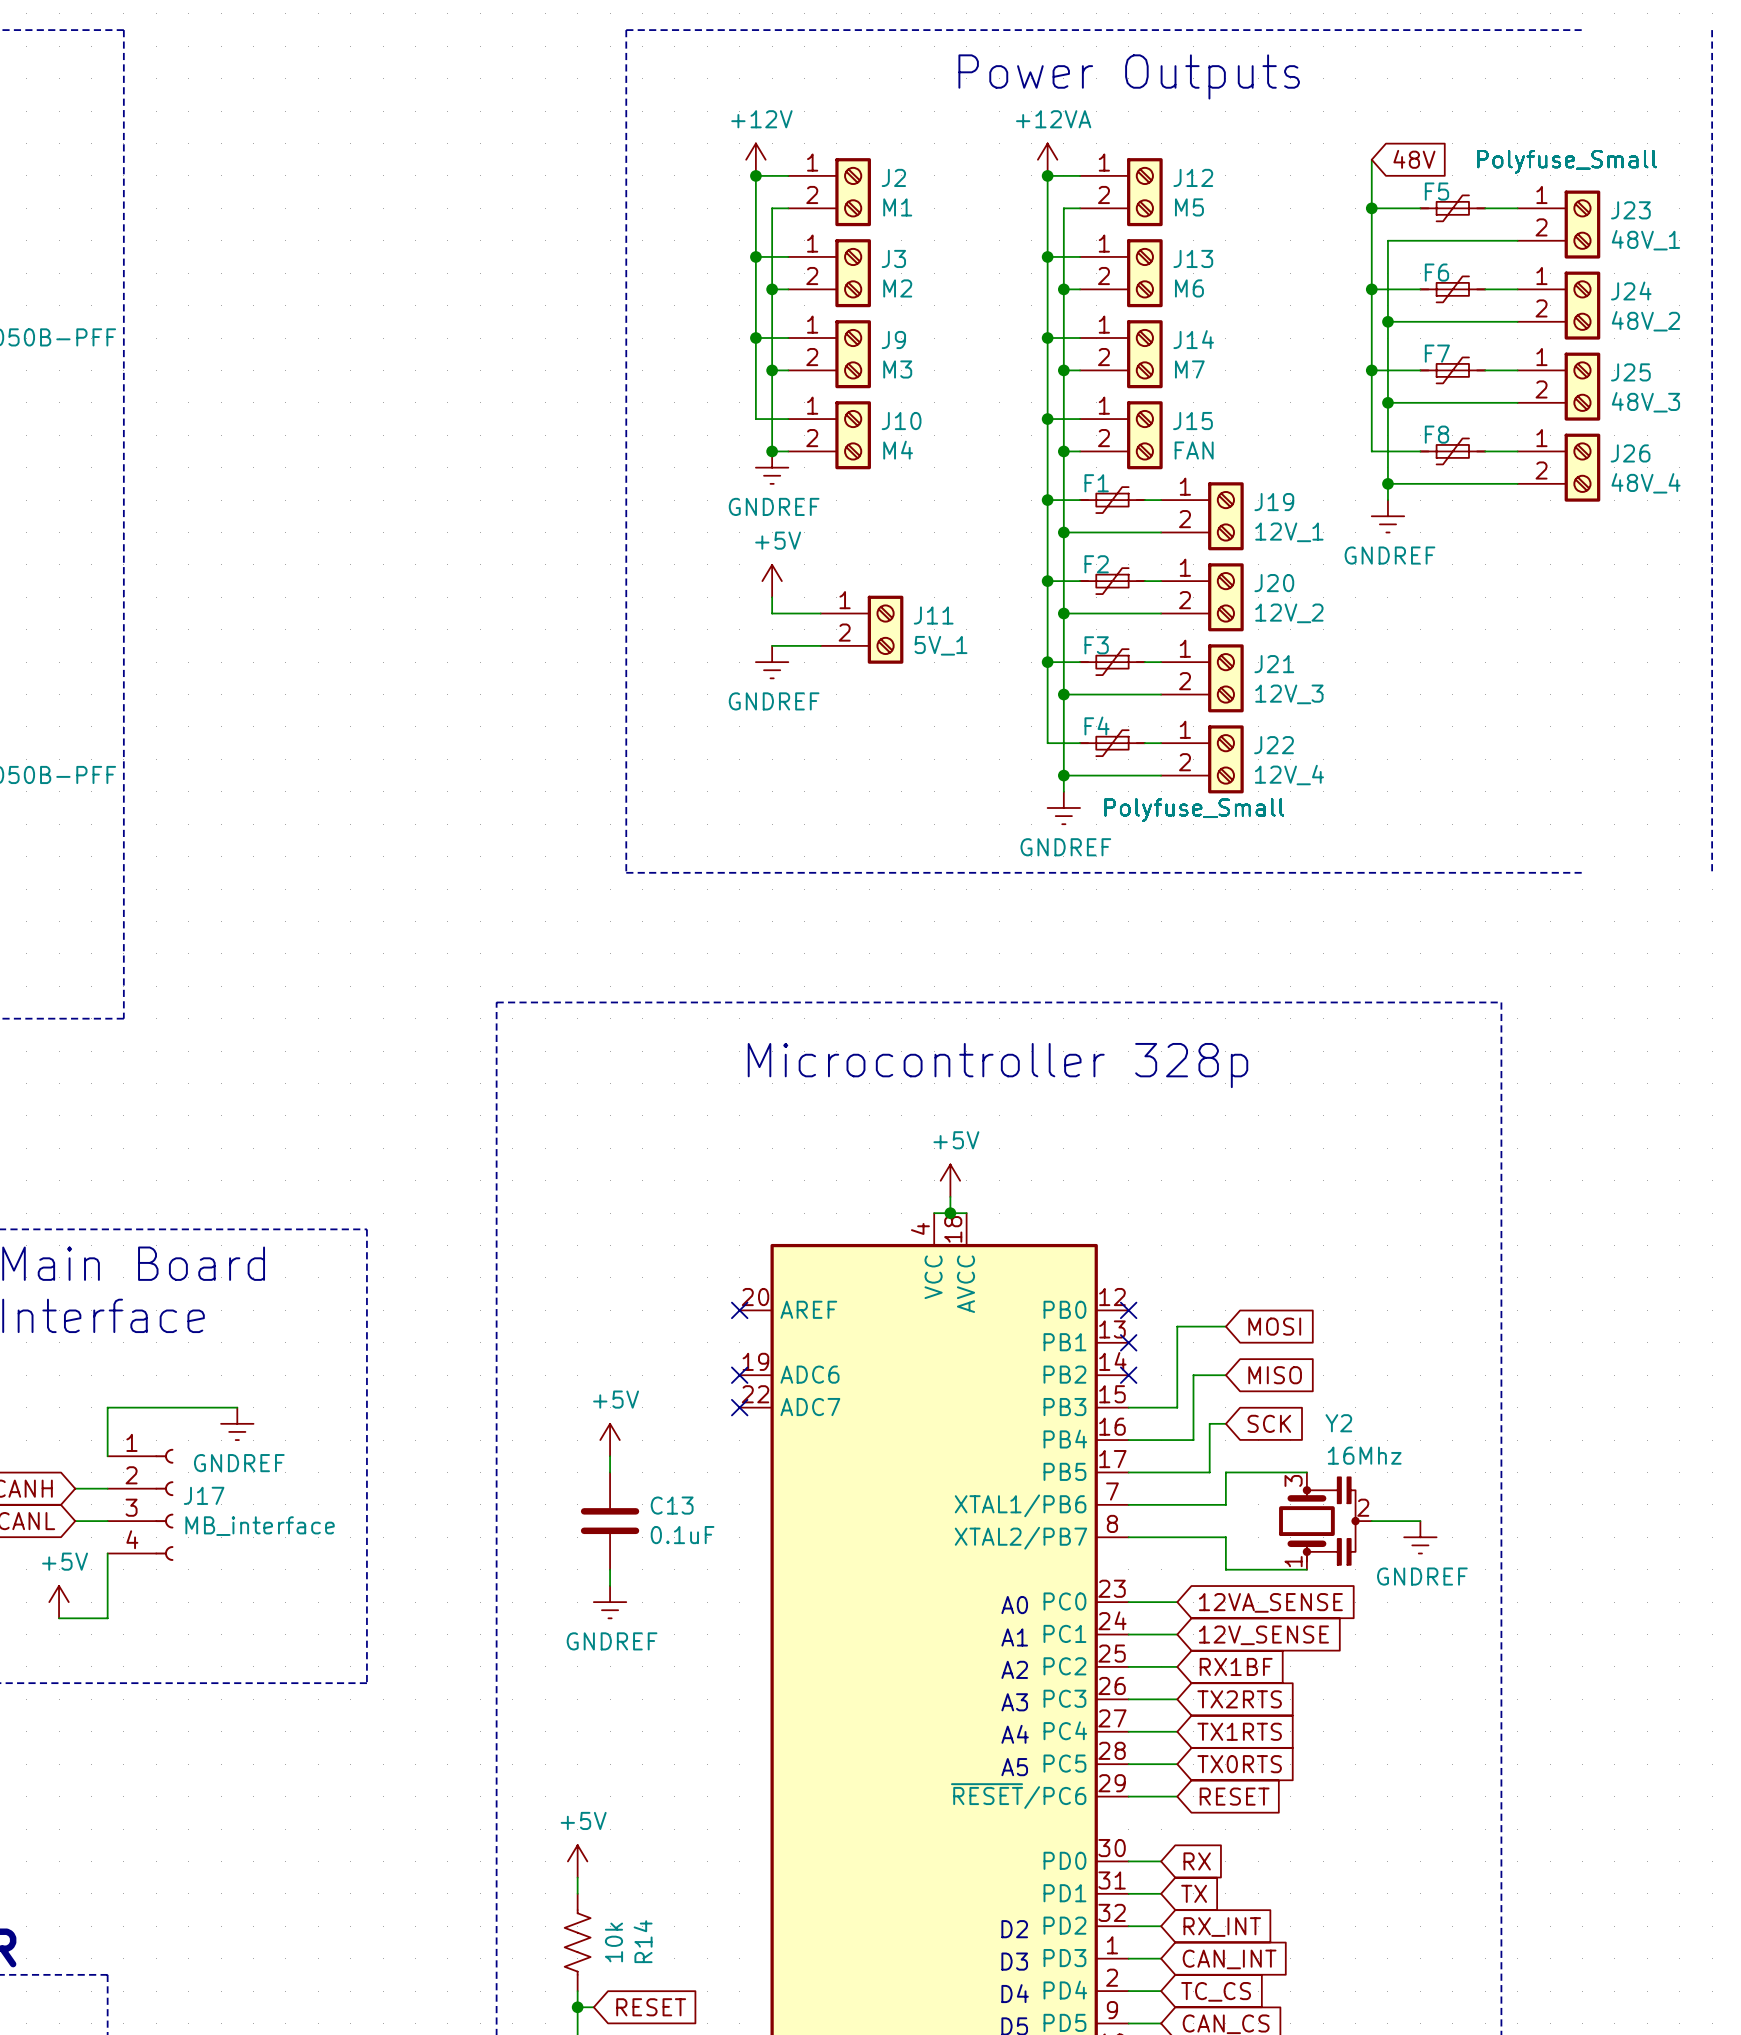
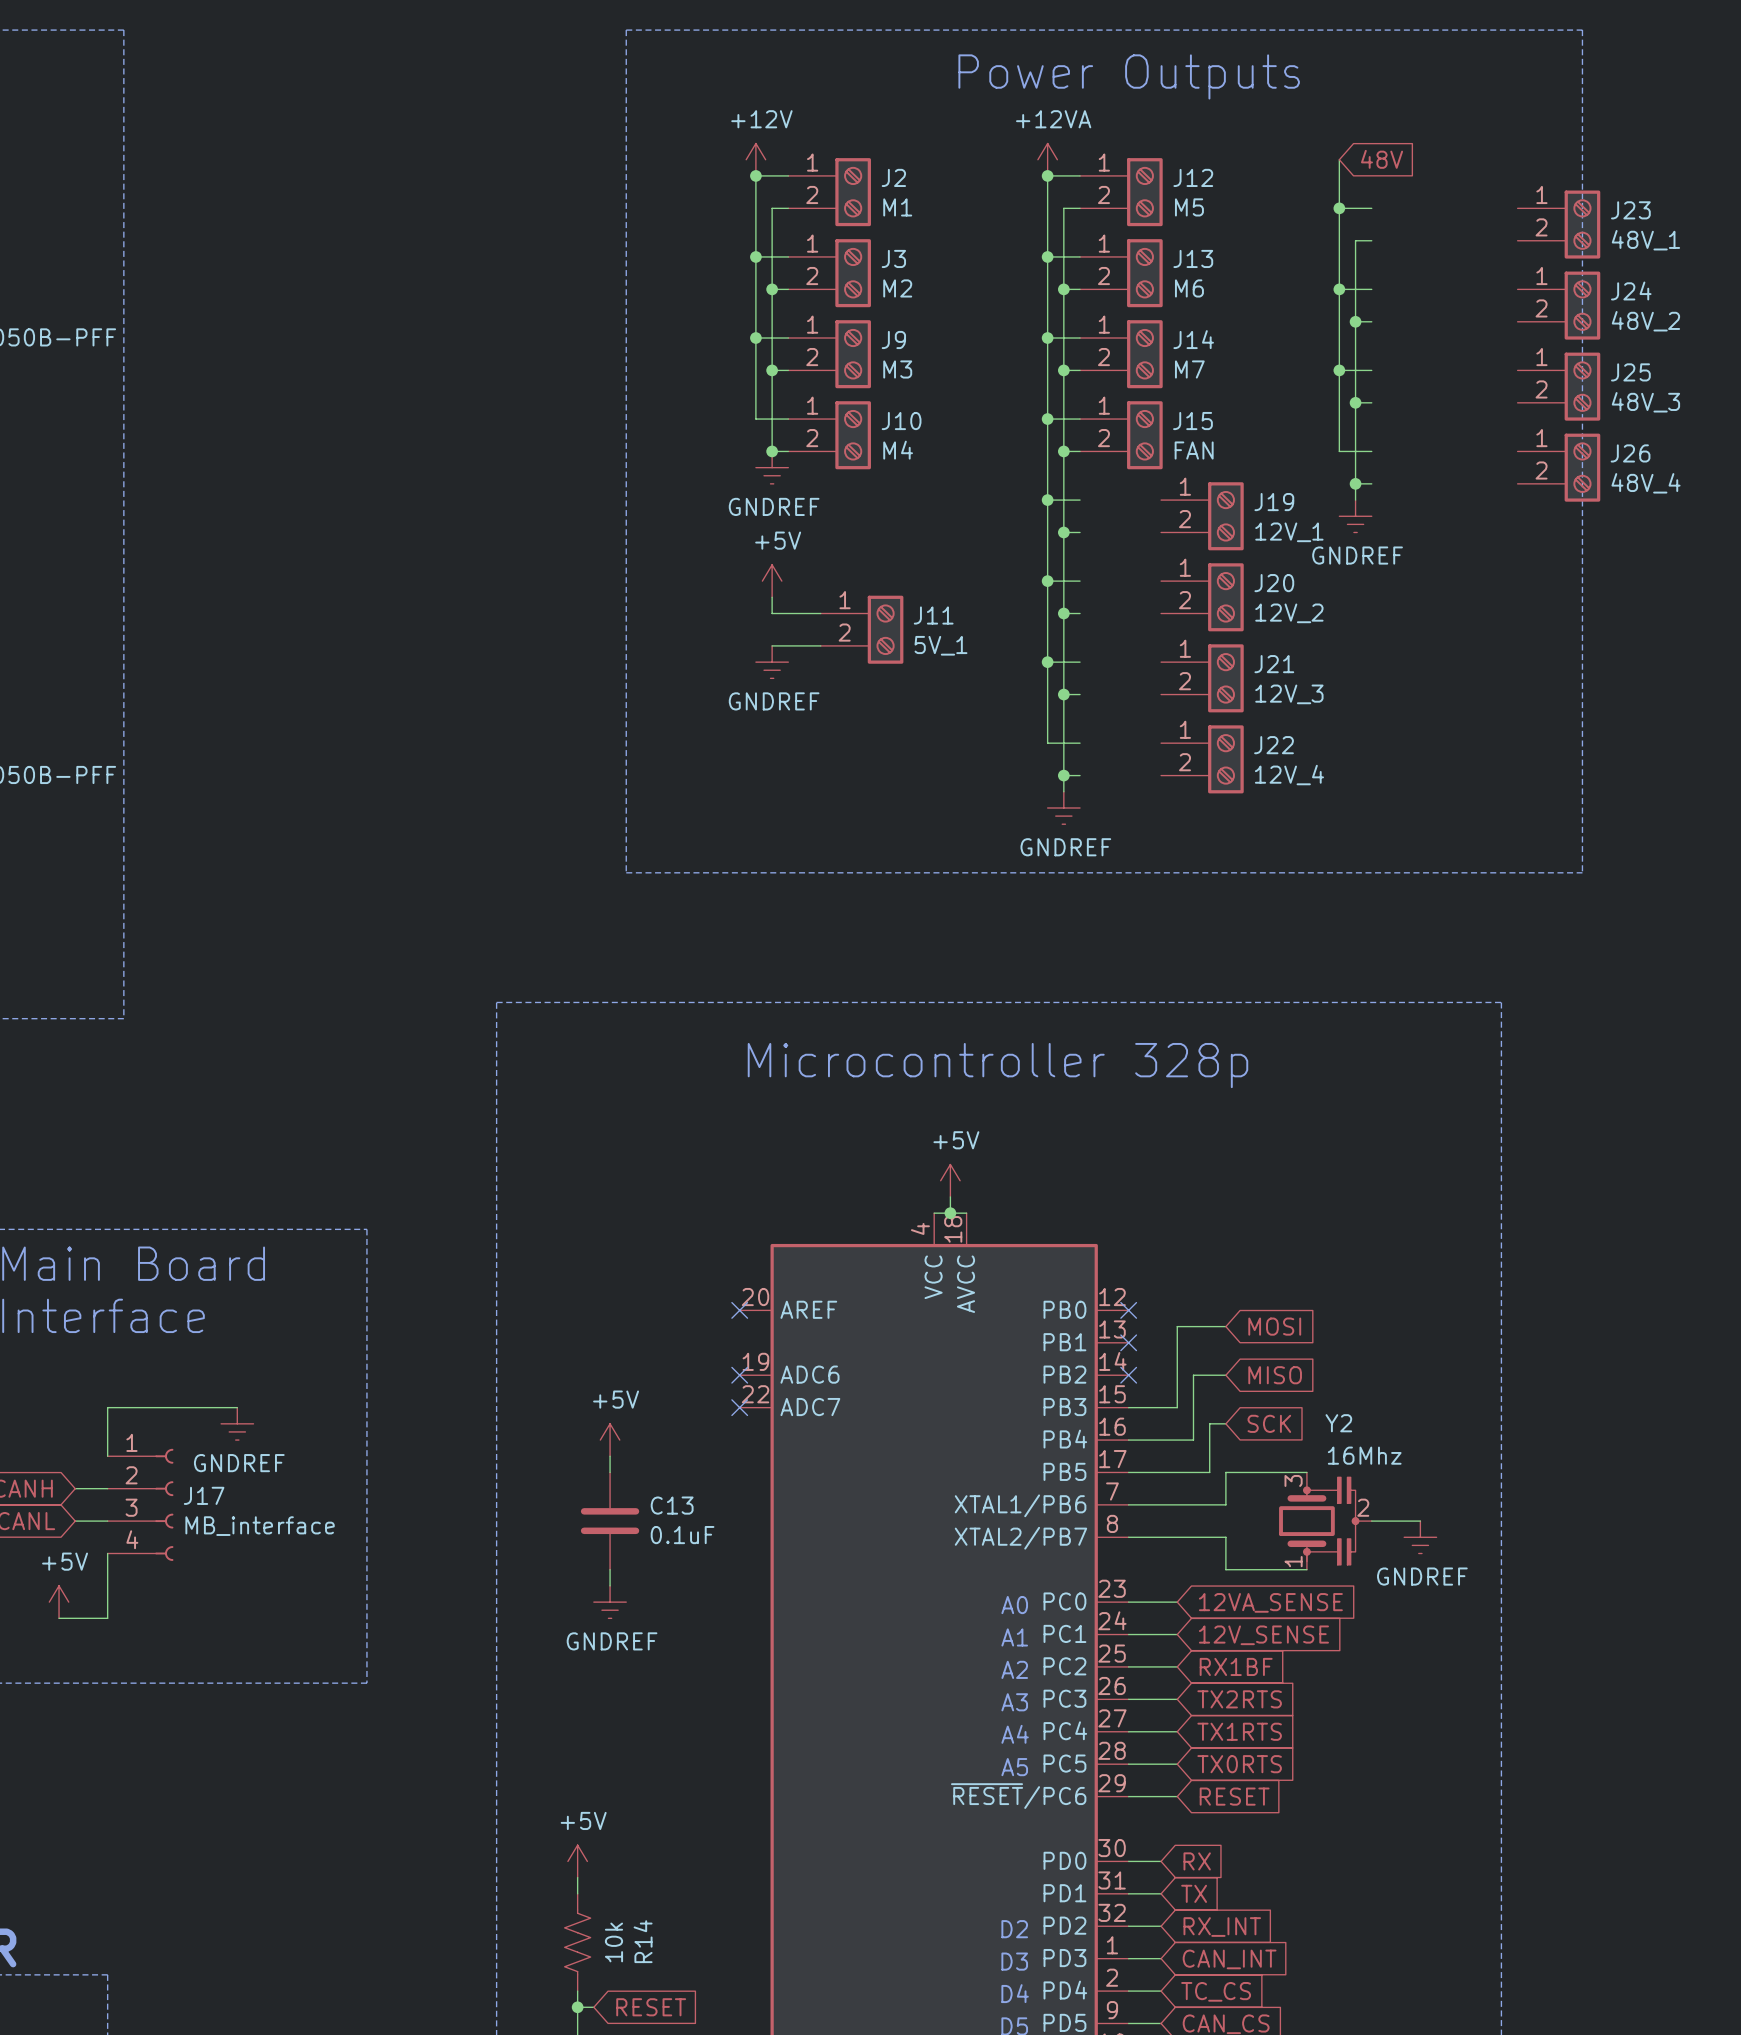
line: (1712, 30) (1712, 872) -> (1582, 30) (1582, 872)
wire: none -> (1339, 159) (1339, 451) (1371, 451)
wire: (1371, 159) (1371, 451) (1420, 451) -> none
global label position: 48V (1414, 159) -> 48V (1382, 159)
wire: (1371, 208) (1420, 208) -> (1371, 208) (1339, 208)
junction position: (1371, 208) -> (1339, 208)
F5: Polyfuse_Small (1452, 208) -> none
wire: (1485, 208) (1517, 208) -> none
wire: none -> (1371, 240) (1355, 240) (1355, 500)
wire: (1517, 240) (1387, 240) (1387, 500) -> none
junction: none -> (1339, 289)
wire: (1371, 289) (1420, 289) -> (1371, 289) (1339, 289)
junction: (1371, 289) -> none
F6: Polyfuse_Small (1452, 289) -> none
wire: (1485, 289) (1517, 289) -> none
junction: none -> (1355, 321)
wire: (1387, 321) (1517, 321) -> none
junction: (1387, 321) -> none
junction: none -> (1339, 370)
wire: (1371, 370) (1420, 370) -> (1371, 370) (1339, 370)
junction: (1371, 370) -> none
F7: Polyfuse_Small (1452, 370) -> none
wire: (1485, 370) (1517, 370) -> none
junction: none -> (1355, 402)
wire: (1387, 402) (1517, 402) -> none
junction: (1387, 402) -> none
F8: Polyfuse_Small (1452, 451) -> none
wire: (1485, 451) (1517, 451) -> none
wire: (1387, 483) (1517, 483) -> none
junction position: (1387, 483) -> (1355, 483)
F1: Polyfuse_Small (1112, 500) -> none
wire: (1144, 500) (1161, 500) -> (1355, 321) (1371, 321)
power symbol position: GNDREF (1387, 516) -> GNDREF (1355, 516)
wire: (1080, 532) (1161, 532) -> none
F2: Polyfuse_Small (1112, 581) -> none
wire: (1144, 581) (1161, 581) -> (1355, 402) (1371, 402)
wire: (1080, 613) (1161, 613) -> none
F3: Polyfuse_Small (1112, 662) -> none
wire: (1144, 662) (1161, 662) -> (1355, 483) (1371, 483)
wire: (1080, 694) (1161, 694) -> none
F4: Polyfuse_Small (1112, 743) -> none
wire: (1144, 743) (1161, 743) -> none
wire: (1080, 775) (1161, 775) -> none

